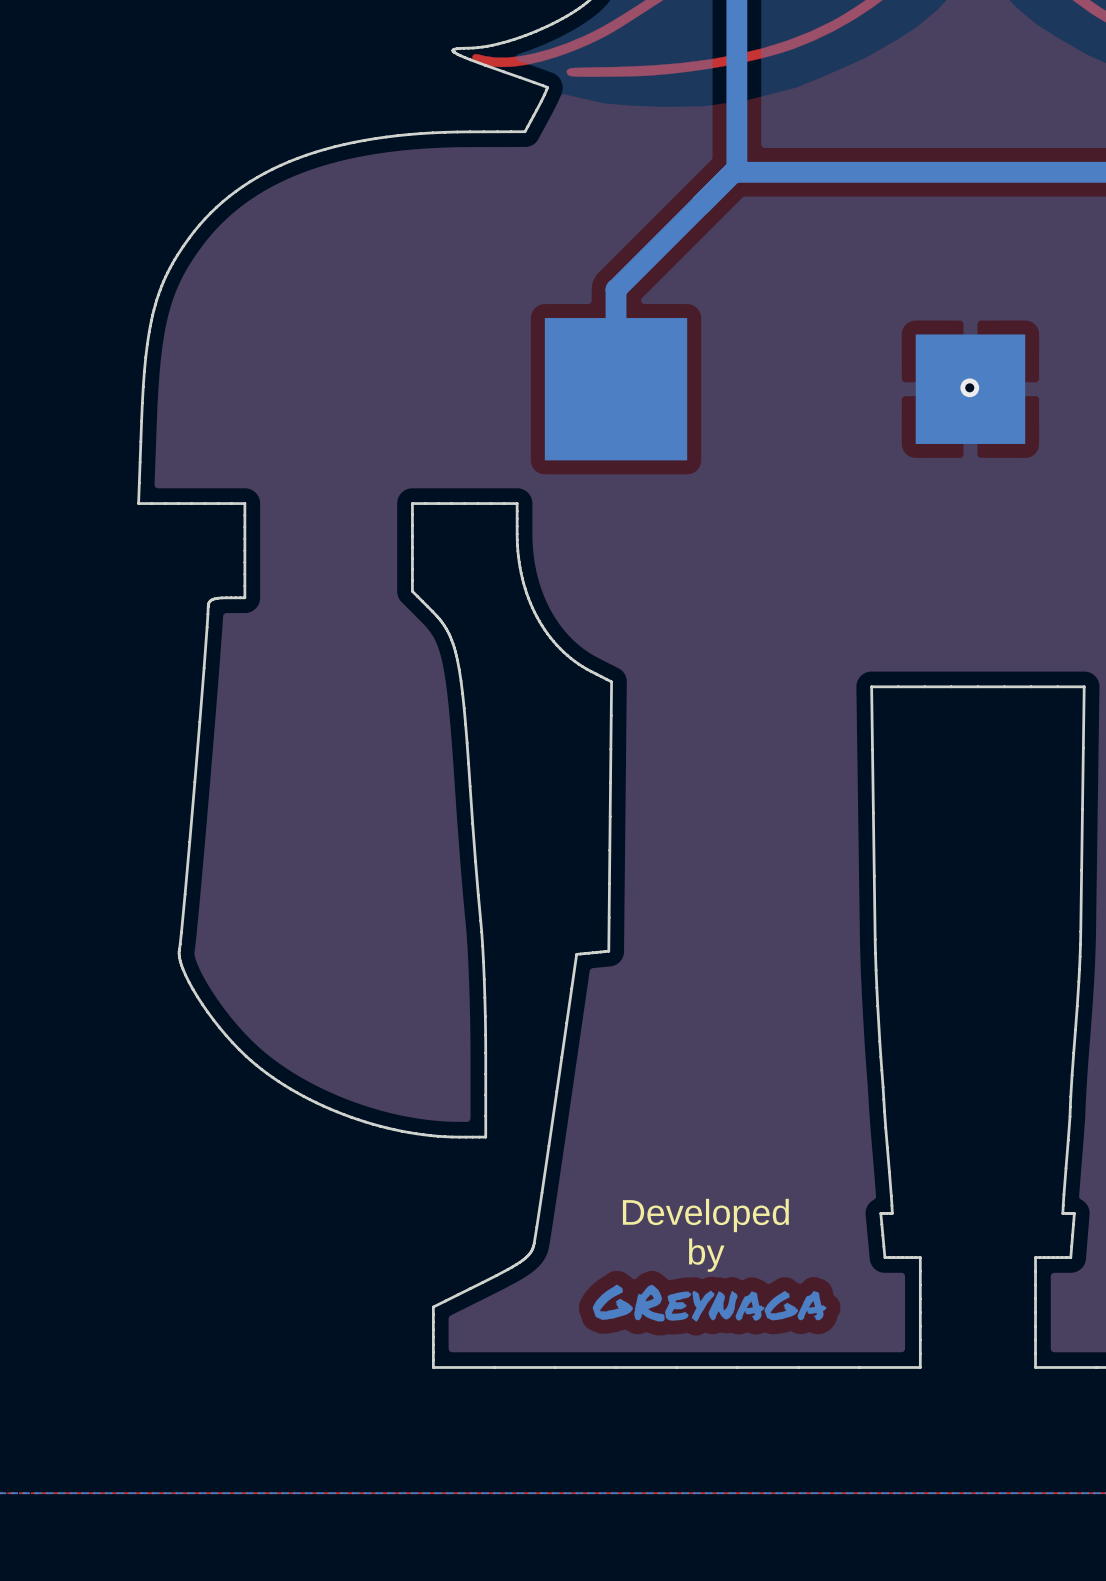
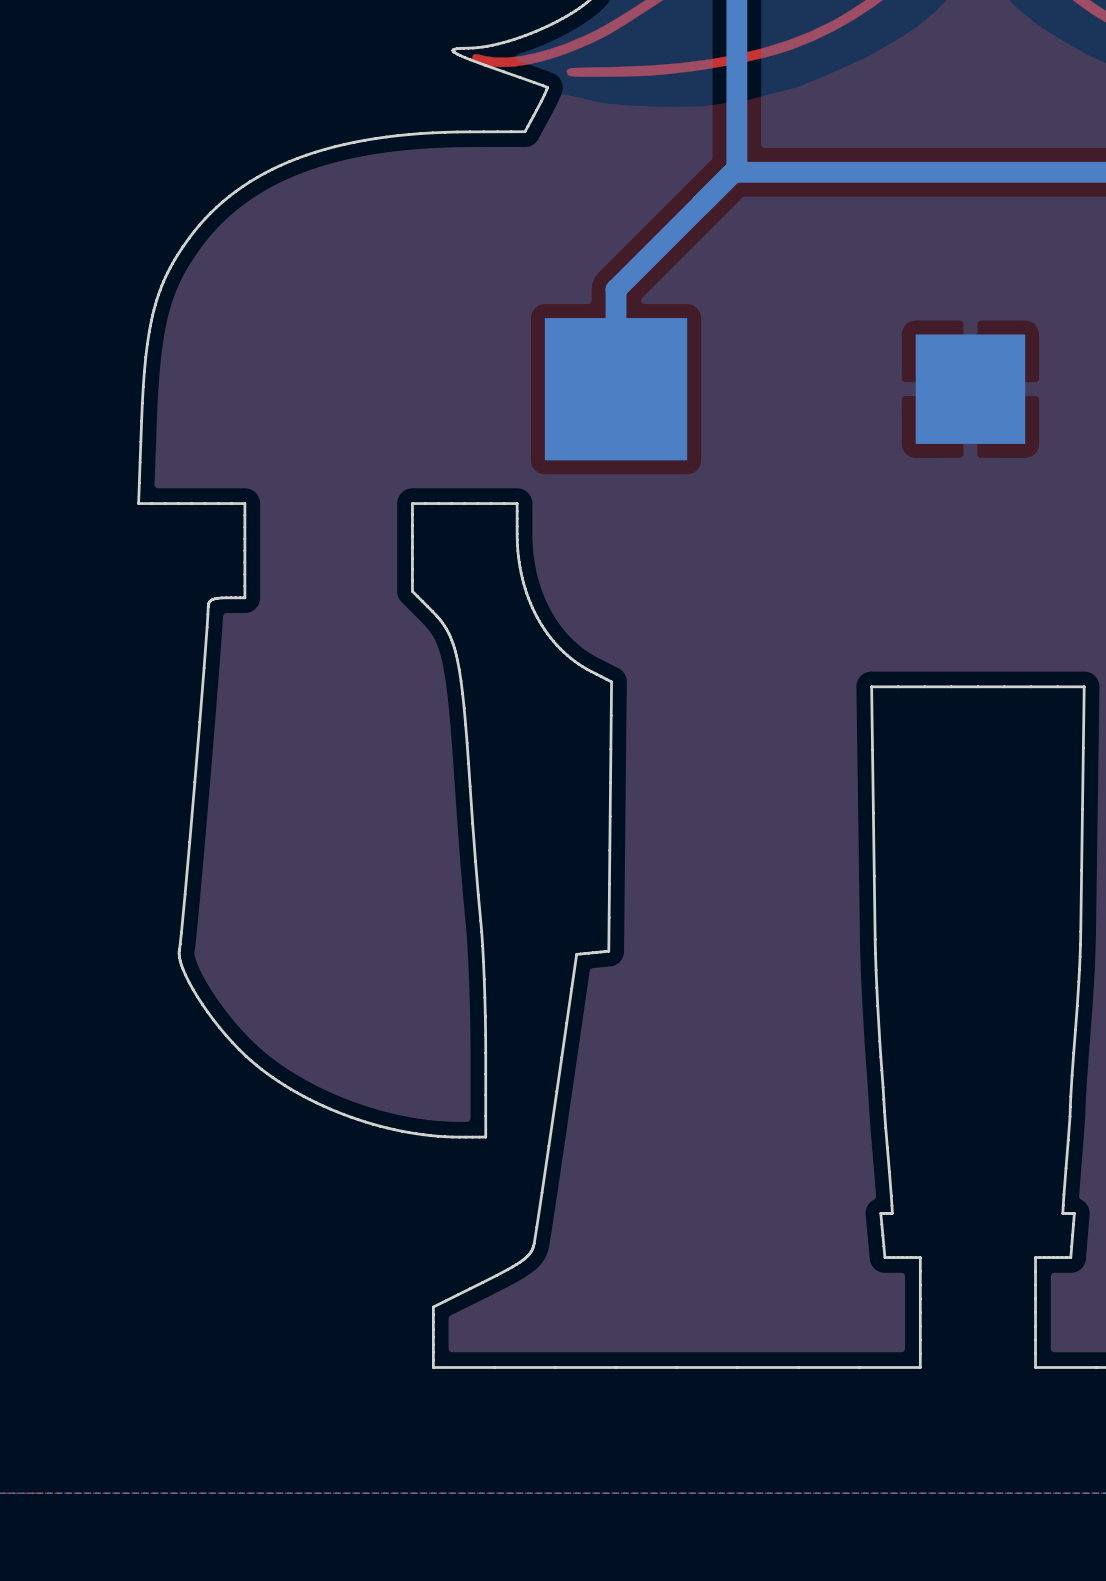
via: (969, 387) -> none
text: Developed (705, 1215) -> none
text: by (706, 1255) -> none
drawing: [592, 1284, 827, 1322] -> none

